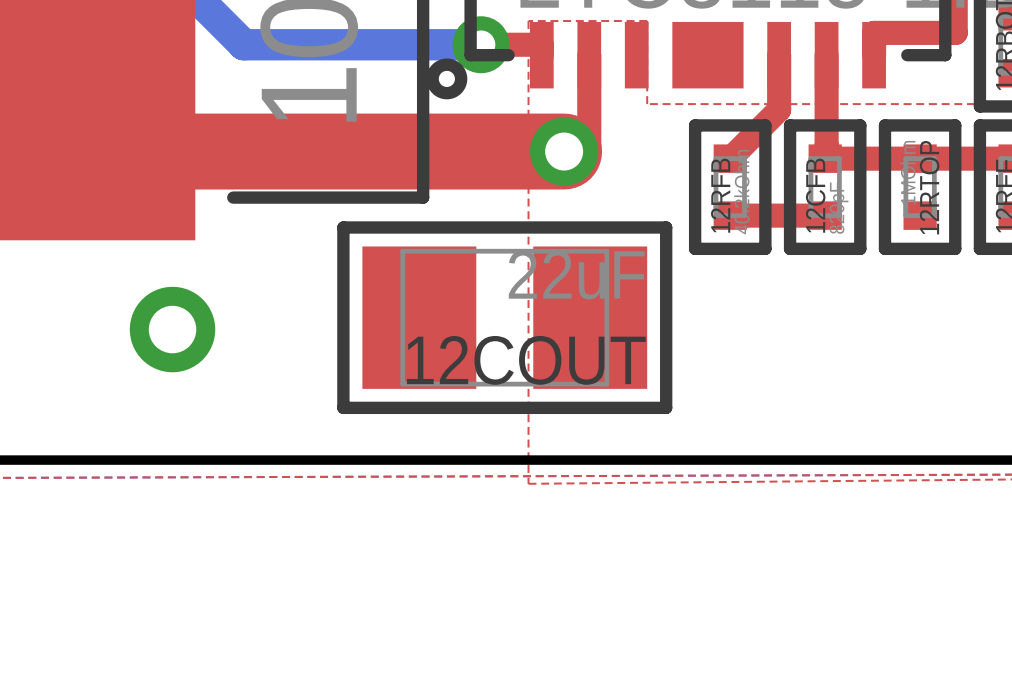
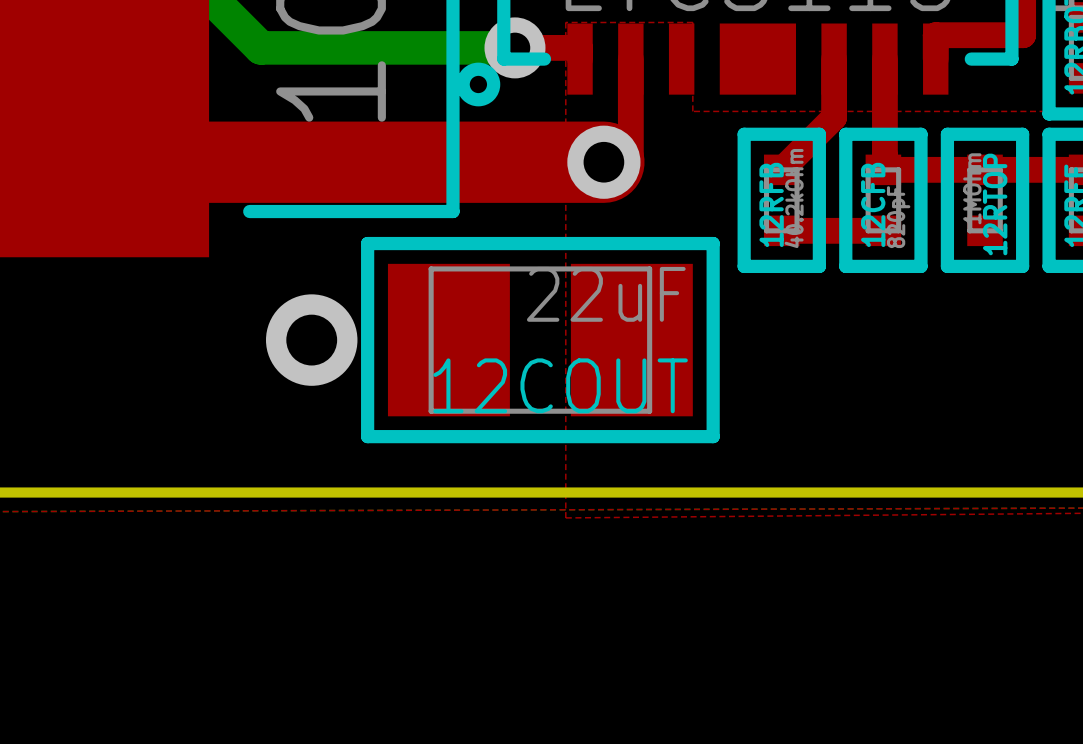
via position: (172, 329) -> (311, 340)

